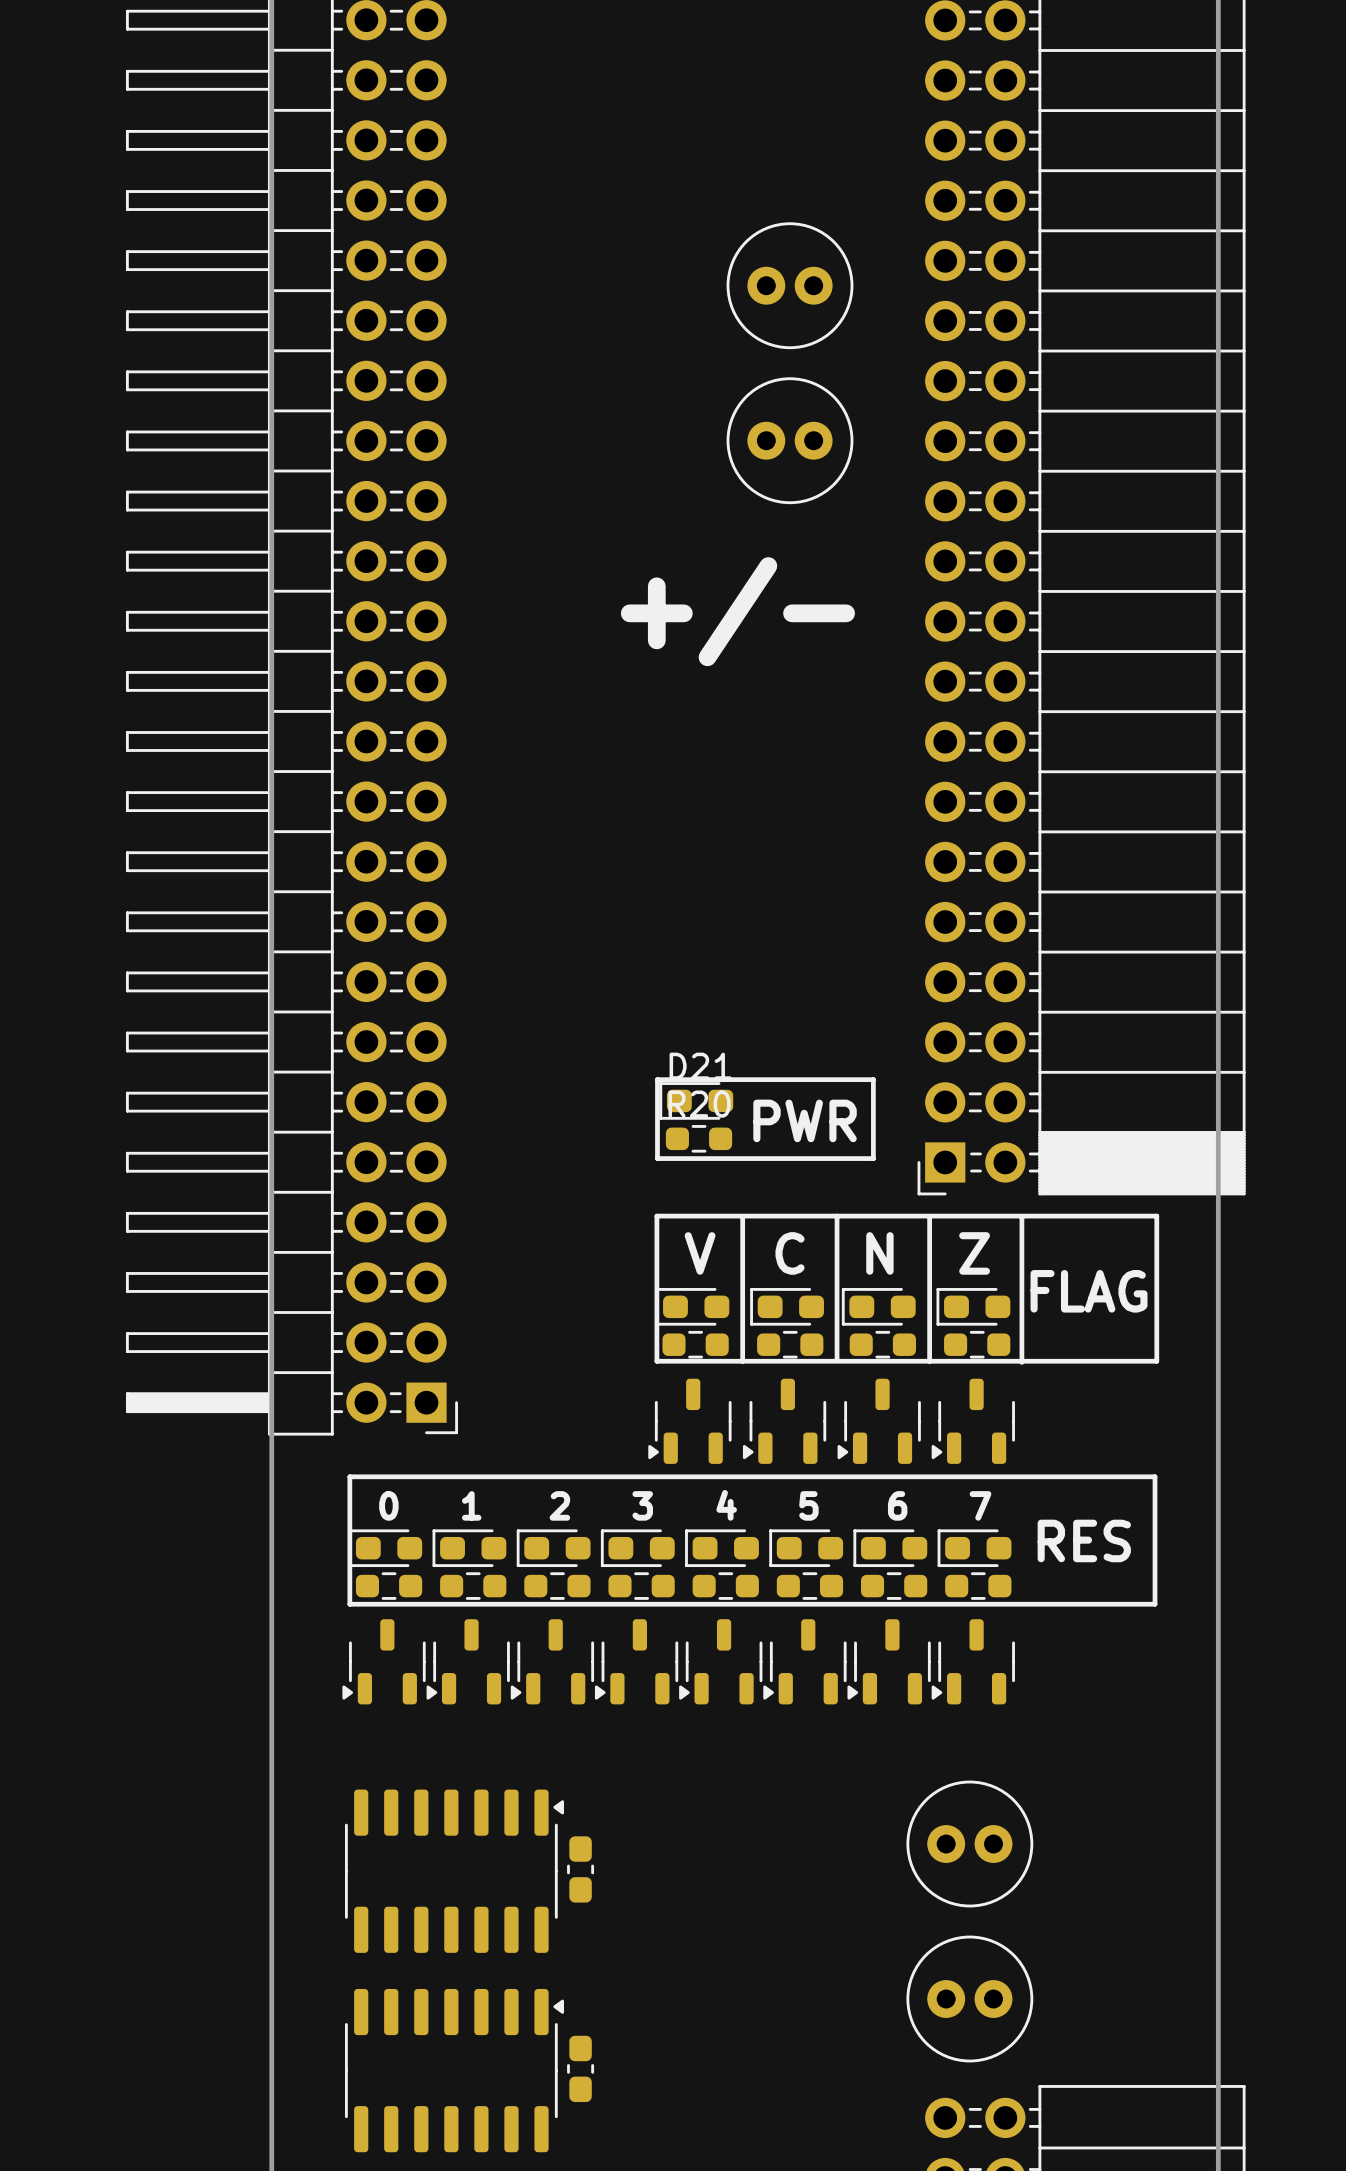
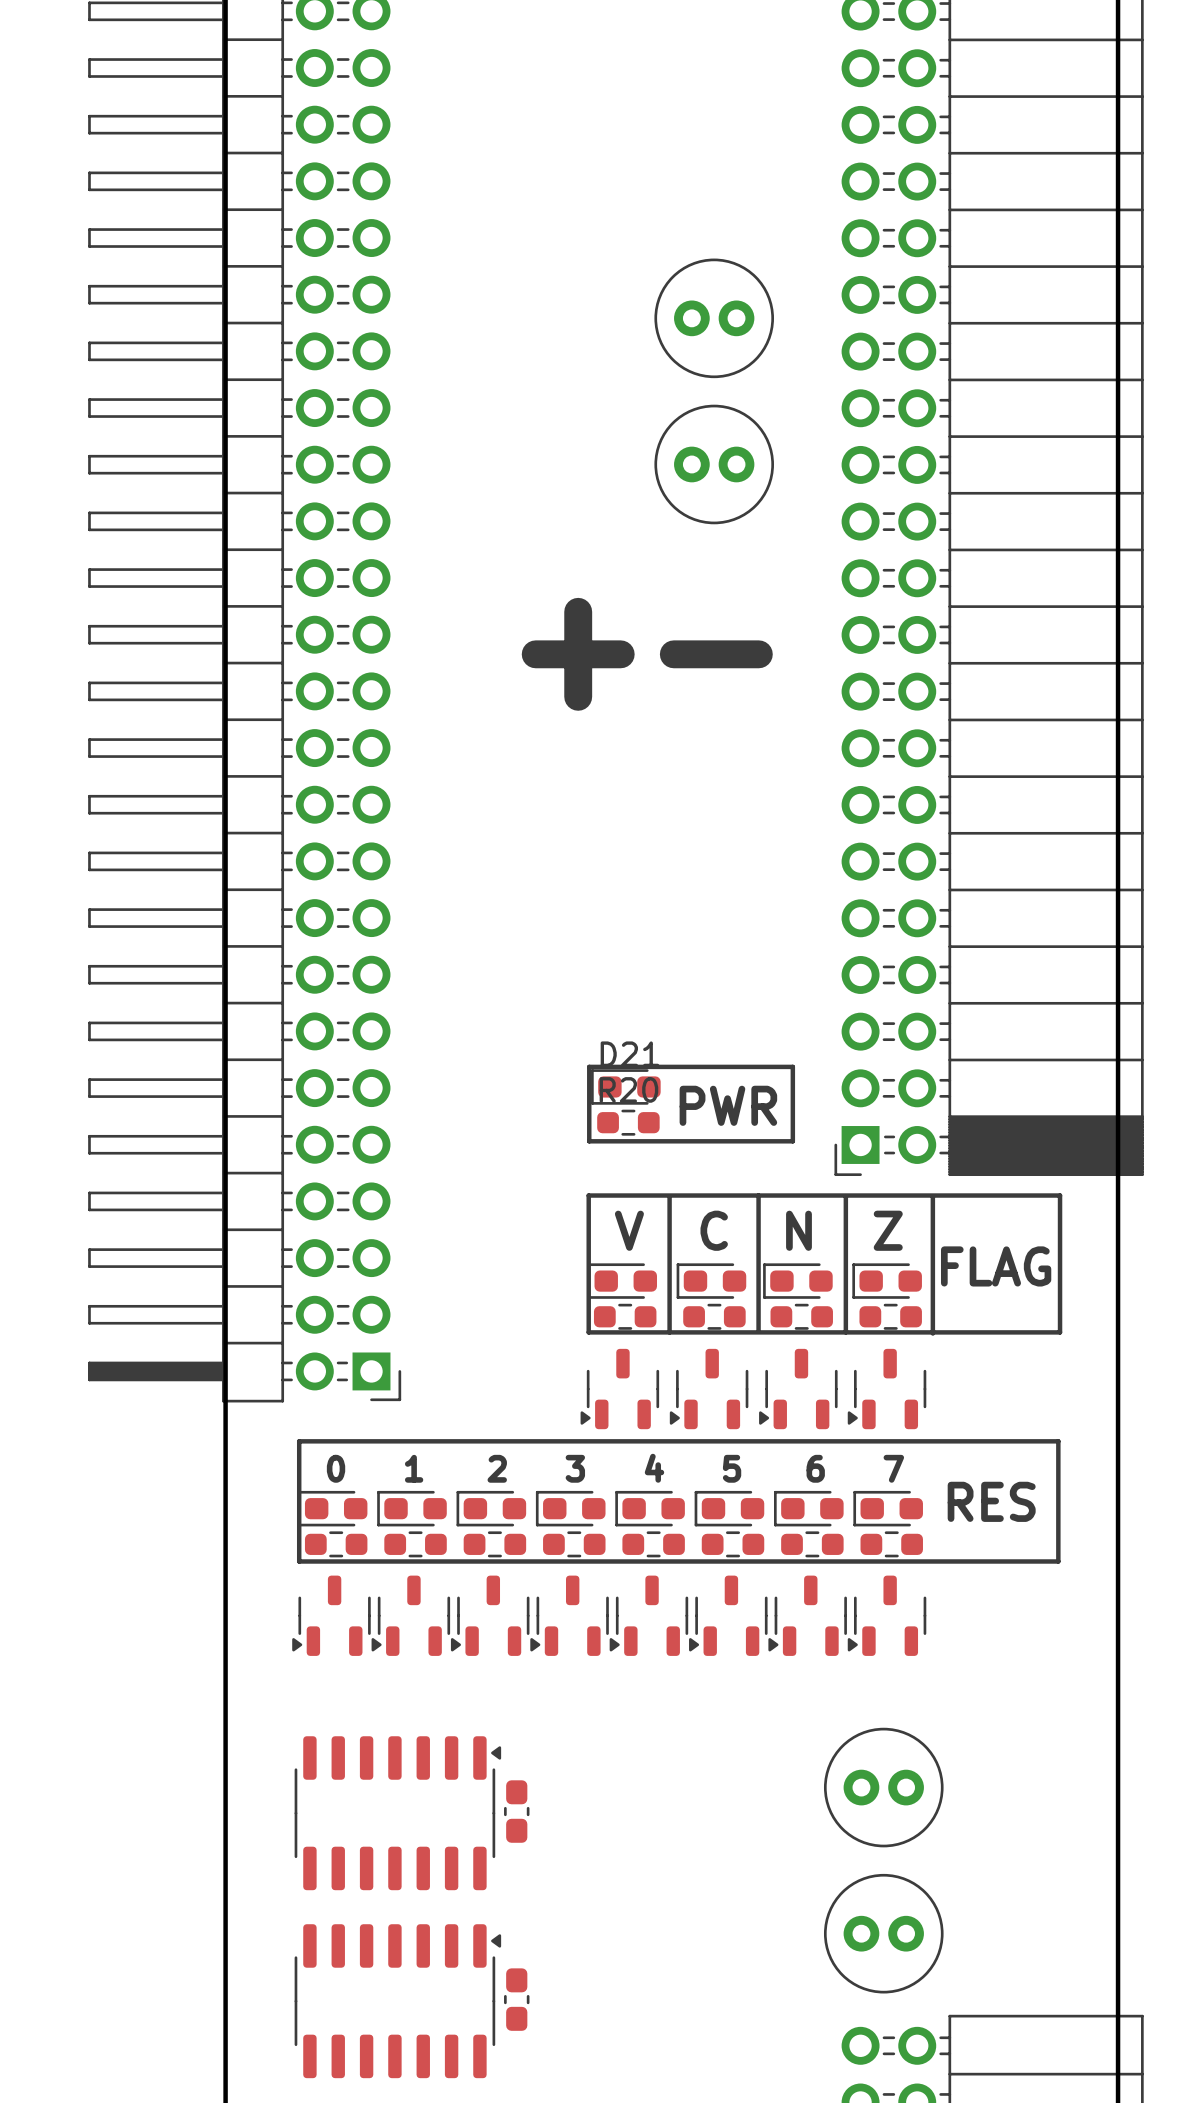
text: +/- (737, 611) -> +- (647, 654)

